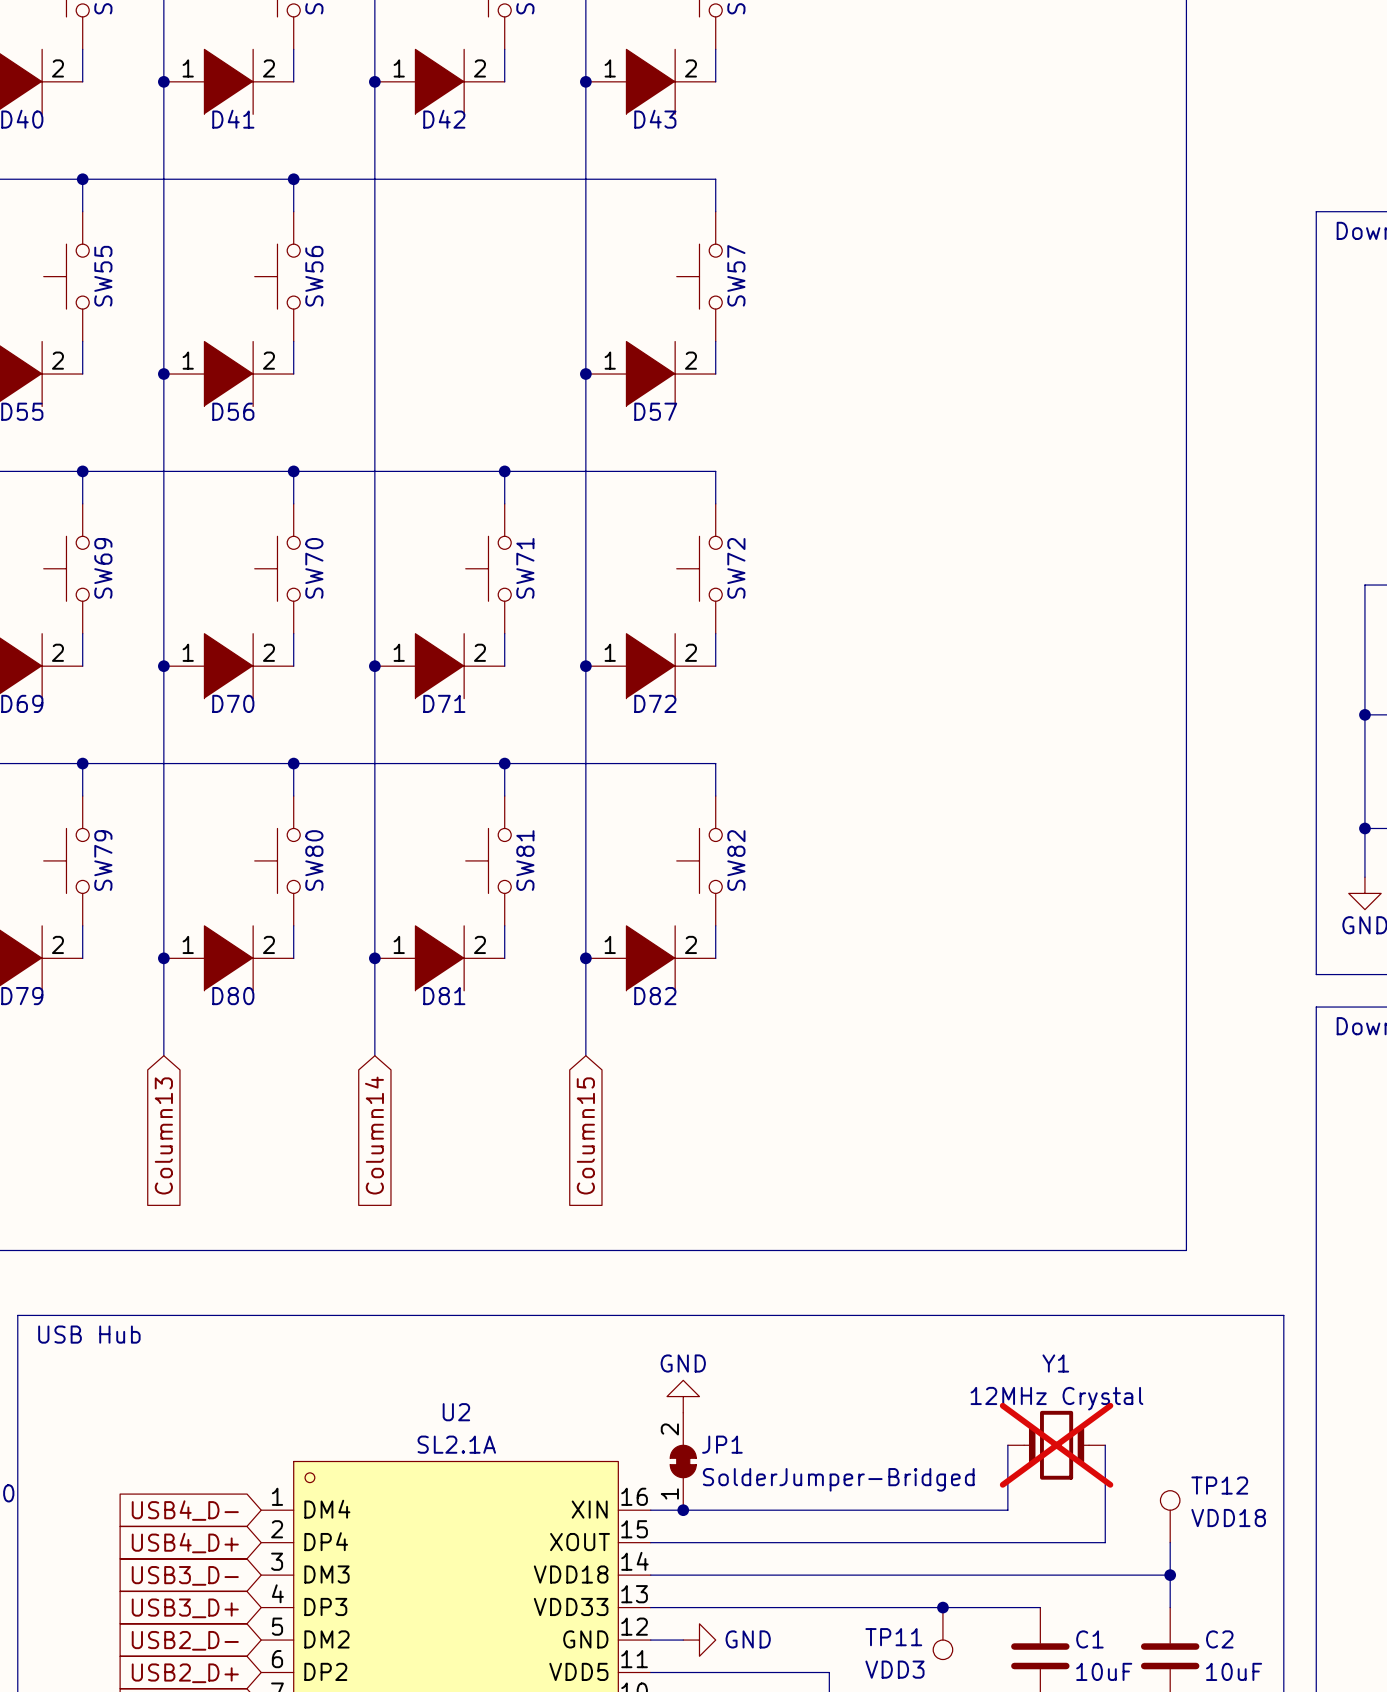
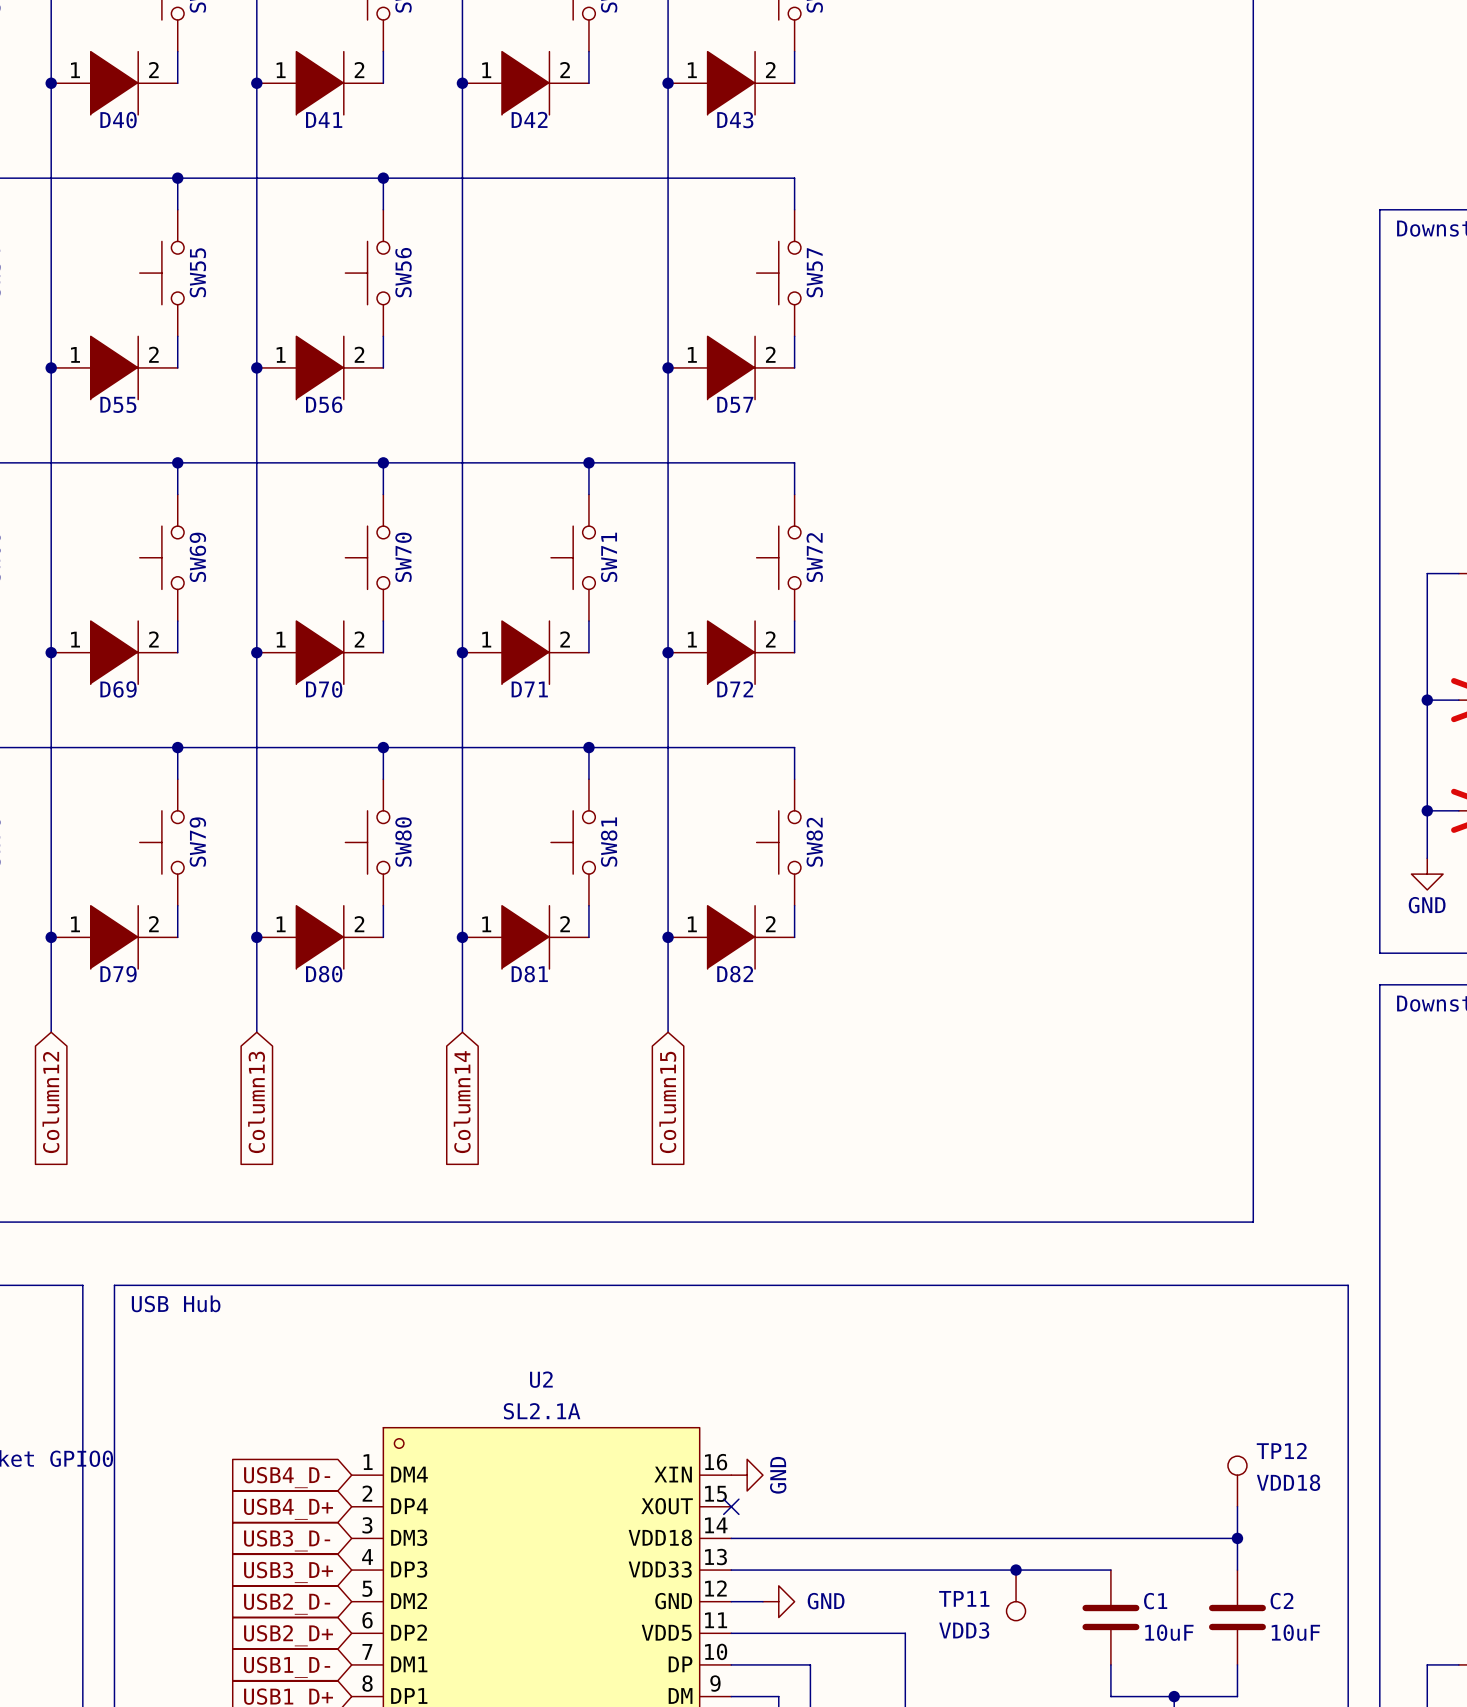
power symbol rotation: 0° (683, 1396) -> 90° clockwise (747, 1475)
power symbol position: GND (683, 1396) -> GND (747, 1475)
wire: (1007, 1445) (1007, 1510) (650, 1510) -> none
Y1: 12MHz Crystal (1056, 1445) -> none
wire: (1105, 1445) (1105, 1542) (650, 1542) -> none
JP1: SolderJumper-Bridged (683, 1461) -> none
junction: (683, 1510) -> none
no-connect mark: none -> (731, 1506)

